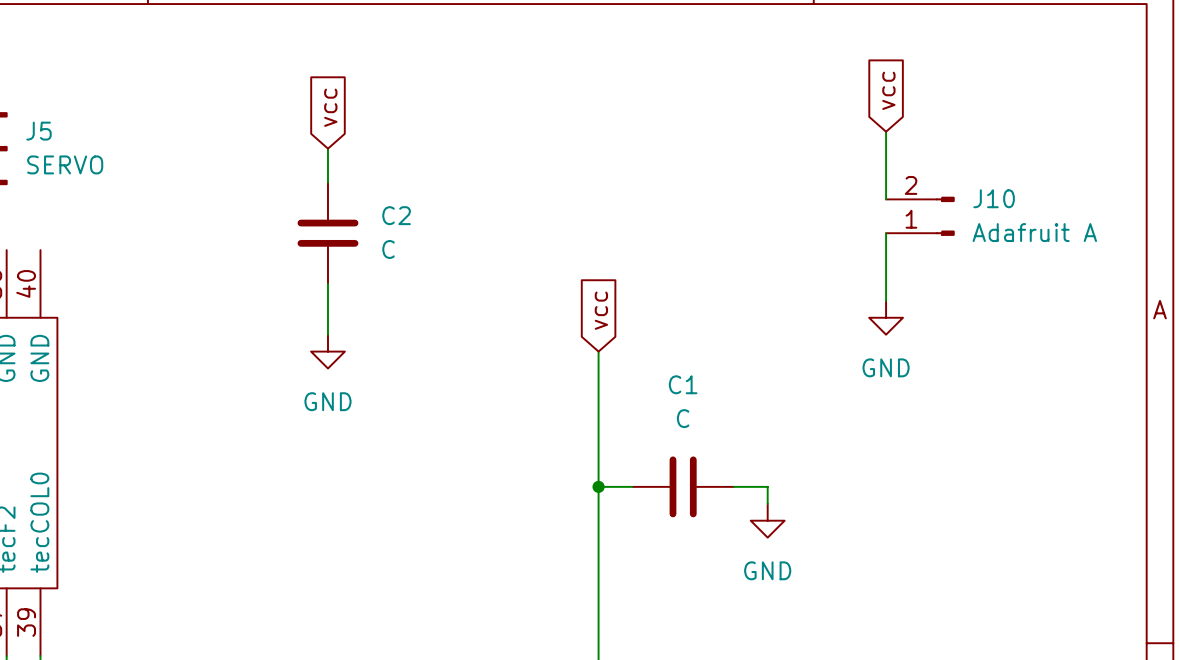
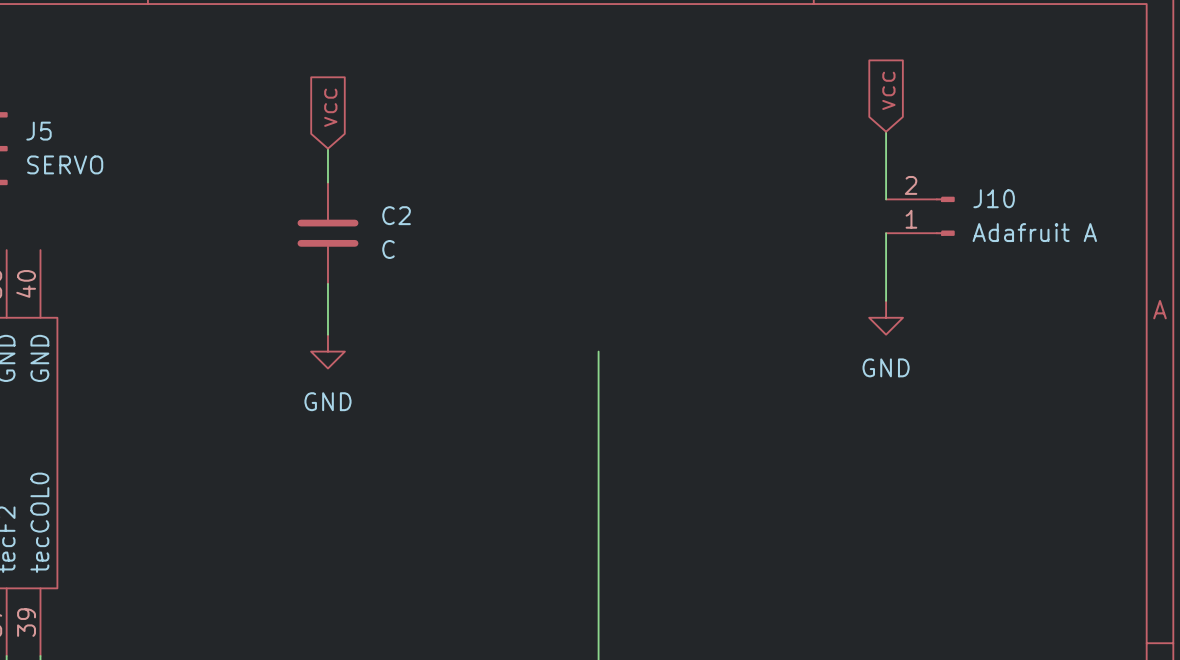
global label: vcc (601, 310) -> none
wire: (598, 486) (632, 486) -> none
junction: (598, 486) -> none
C1: C (683, 486) -> none
wire: (733, 486) (767, 486) (767, 503) -> none
power symbol: GND (767, 520) -> none

